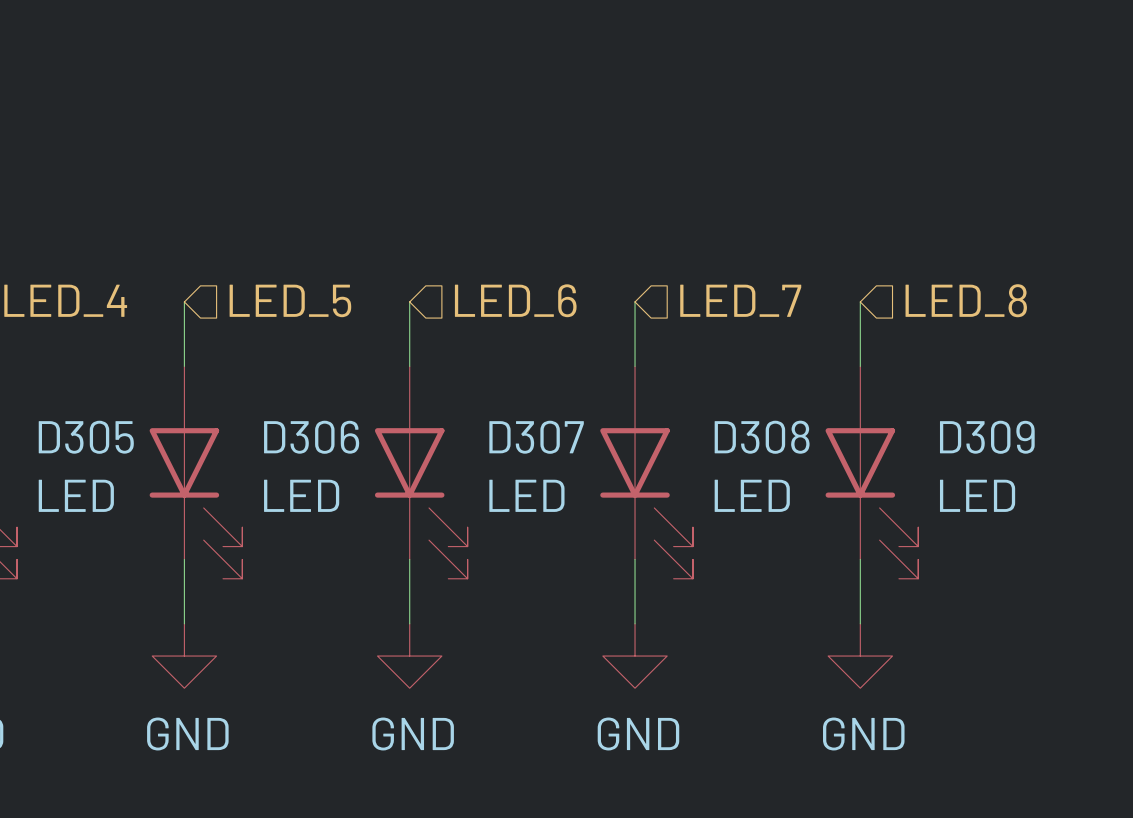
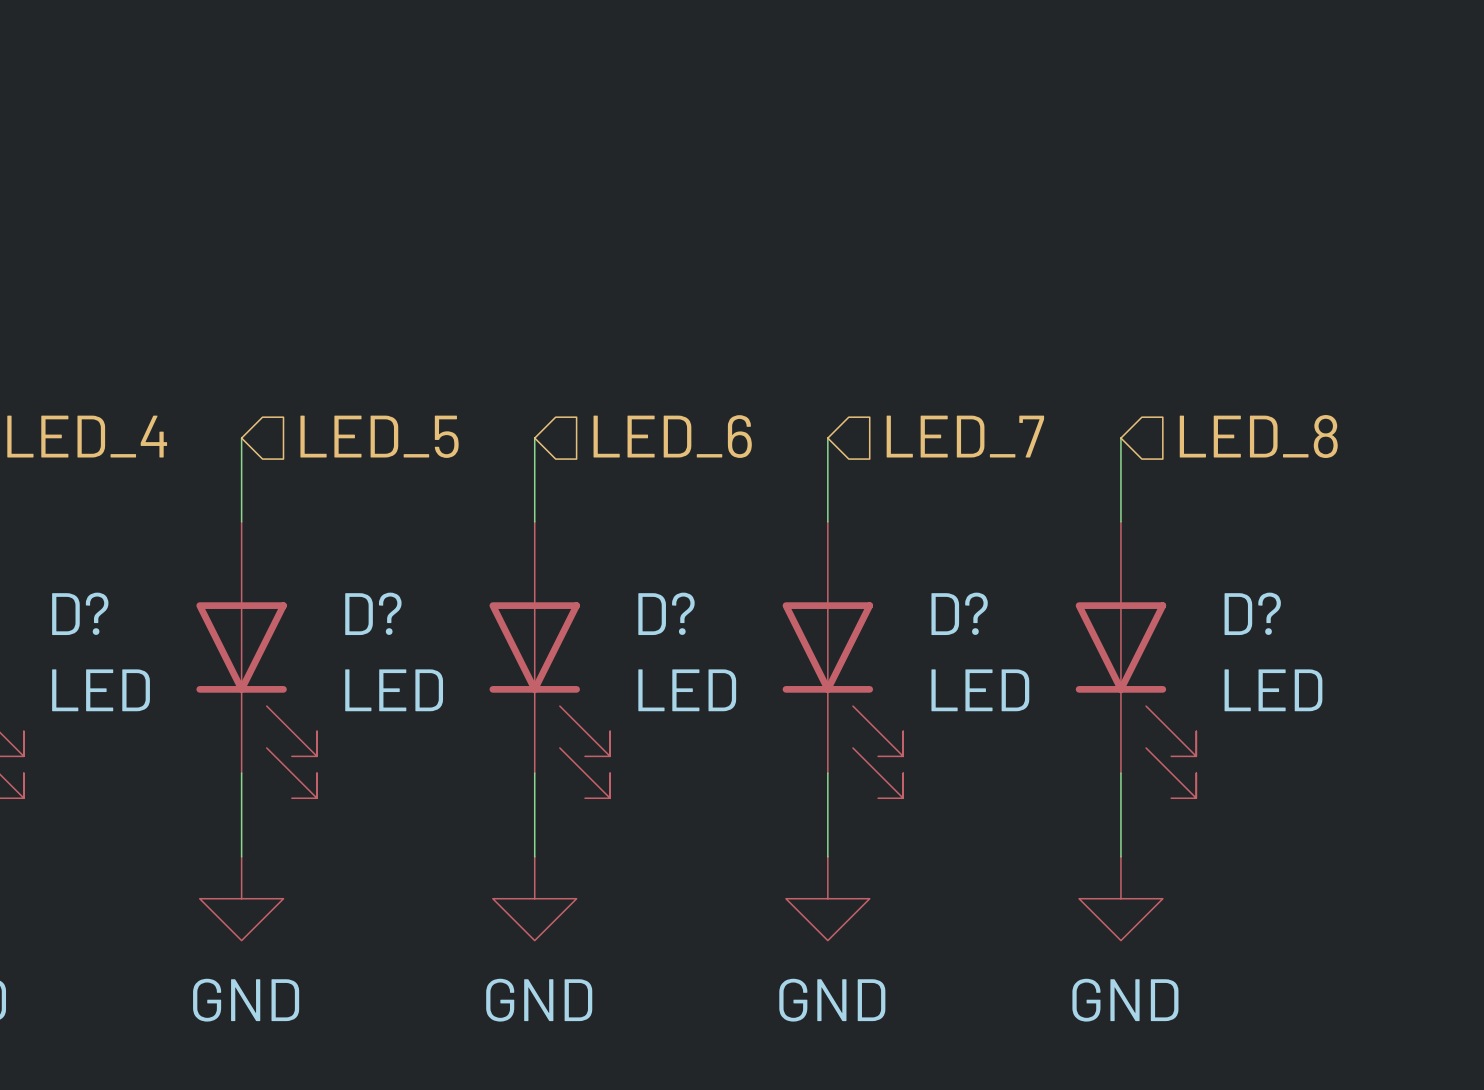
D305 name: D305 (86, 437) -> D? (80, 613)
D306 name: D306 (311, 437) -> D? (373, 613)
D307 name: D307 (536, 437) -> D? (666, 613)
D308 name: D308 (762, 437) -> D? (959, 613)
D309 name: D309 (987, 437) -> D? (1252, 613)

